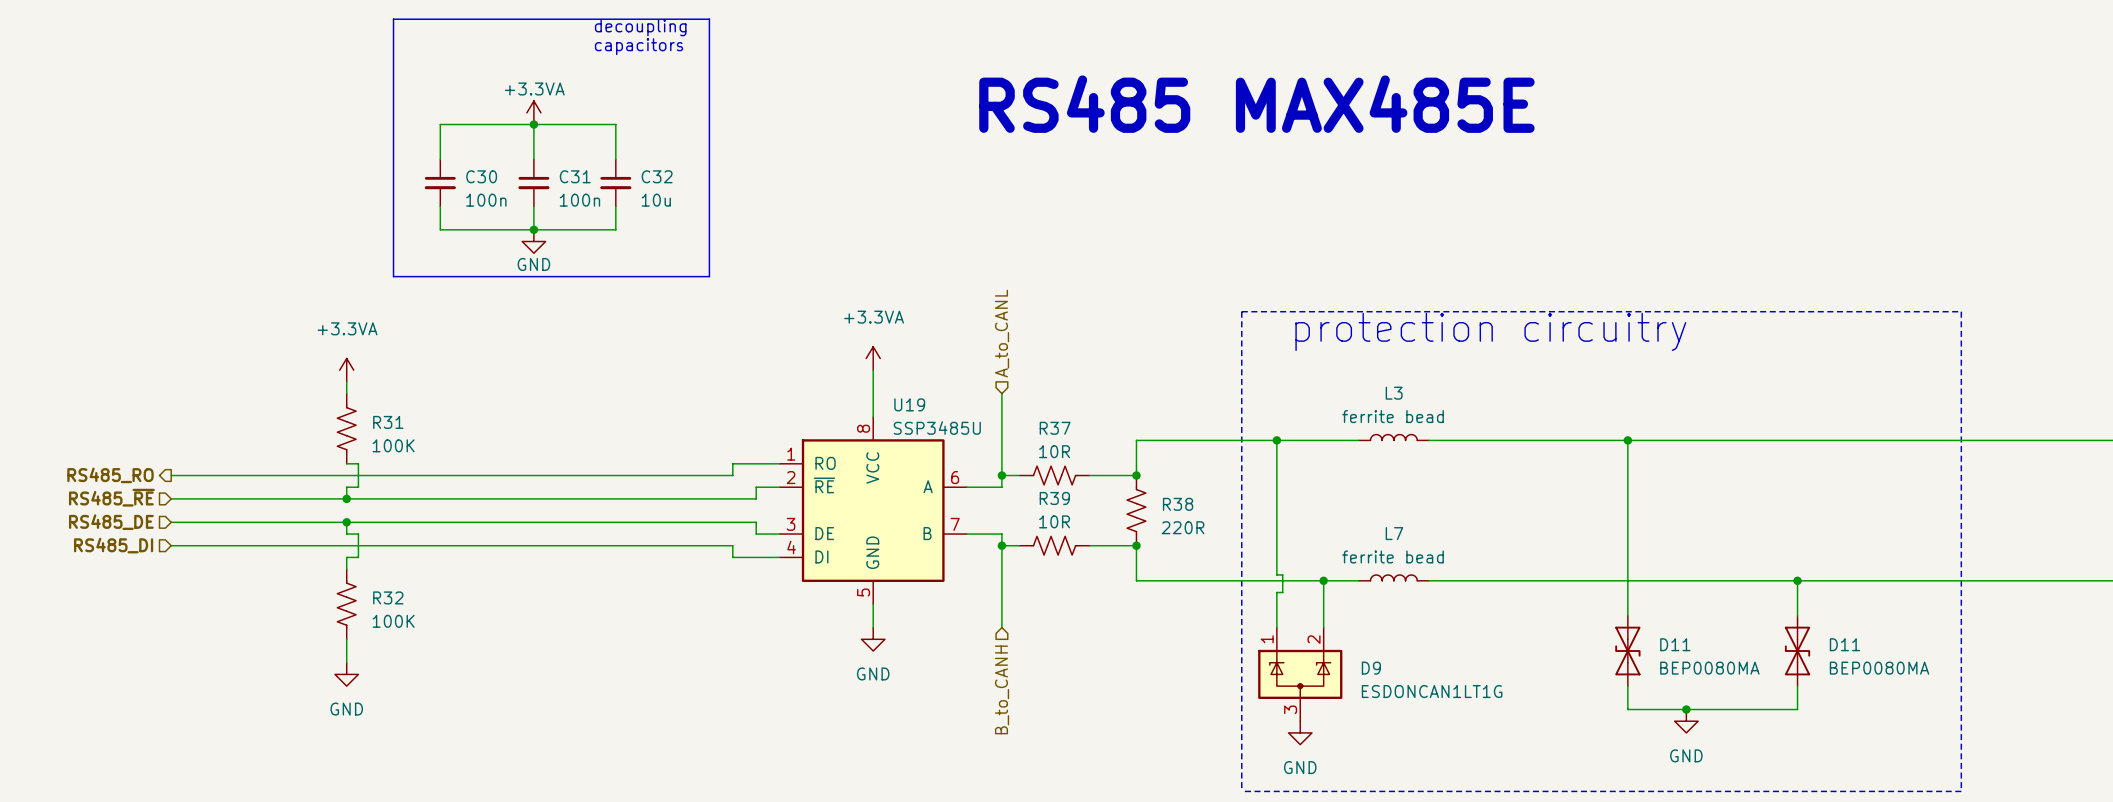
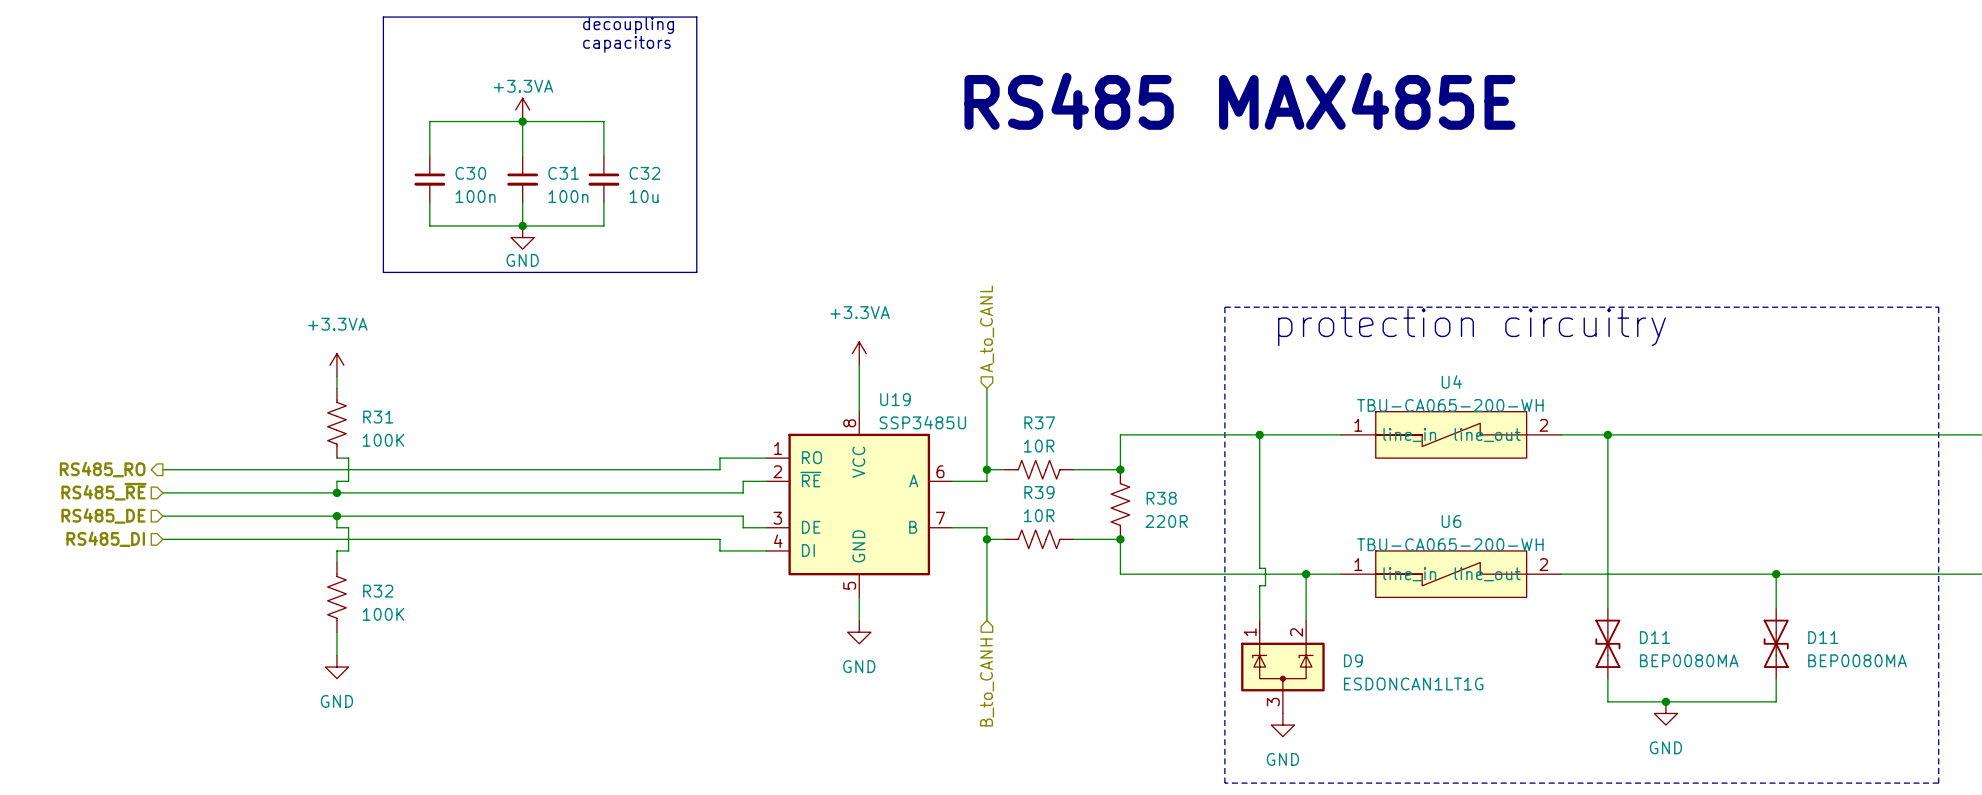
L3: ferrite bead (1393, 437) -> none
U4: none -> TBU-CA065-200-WH (1451, 434)
L7: ferrite bead (1393, 577) -> none
U6: none -> TBU-CA065-200-WH (1451, 574)

